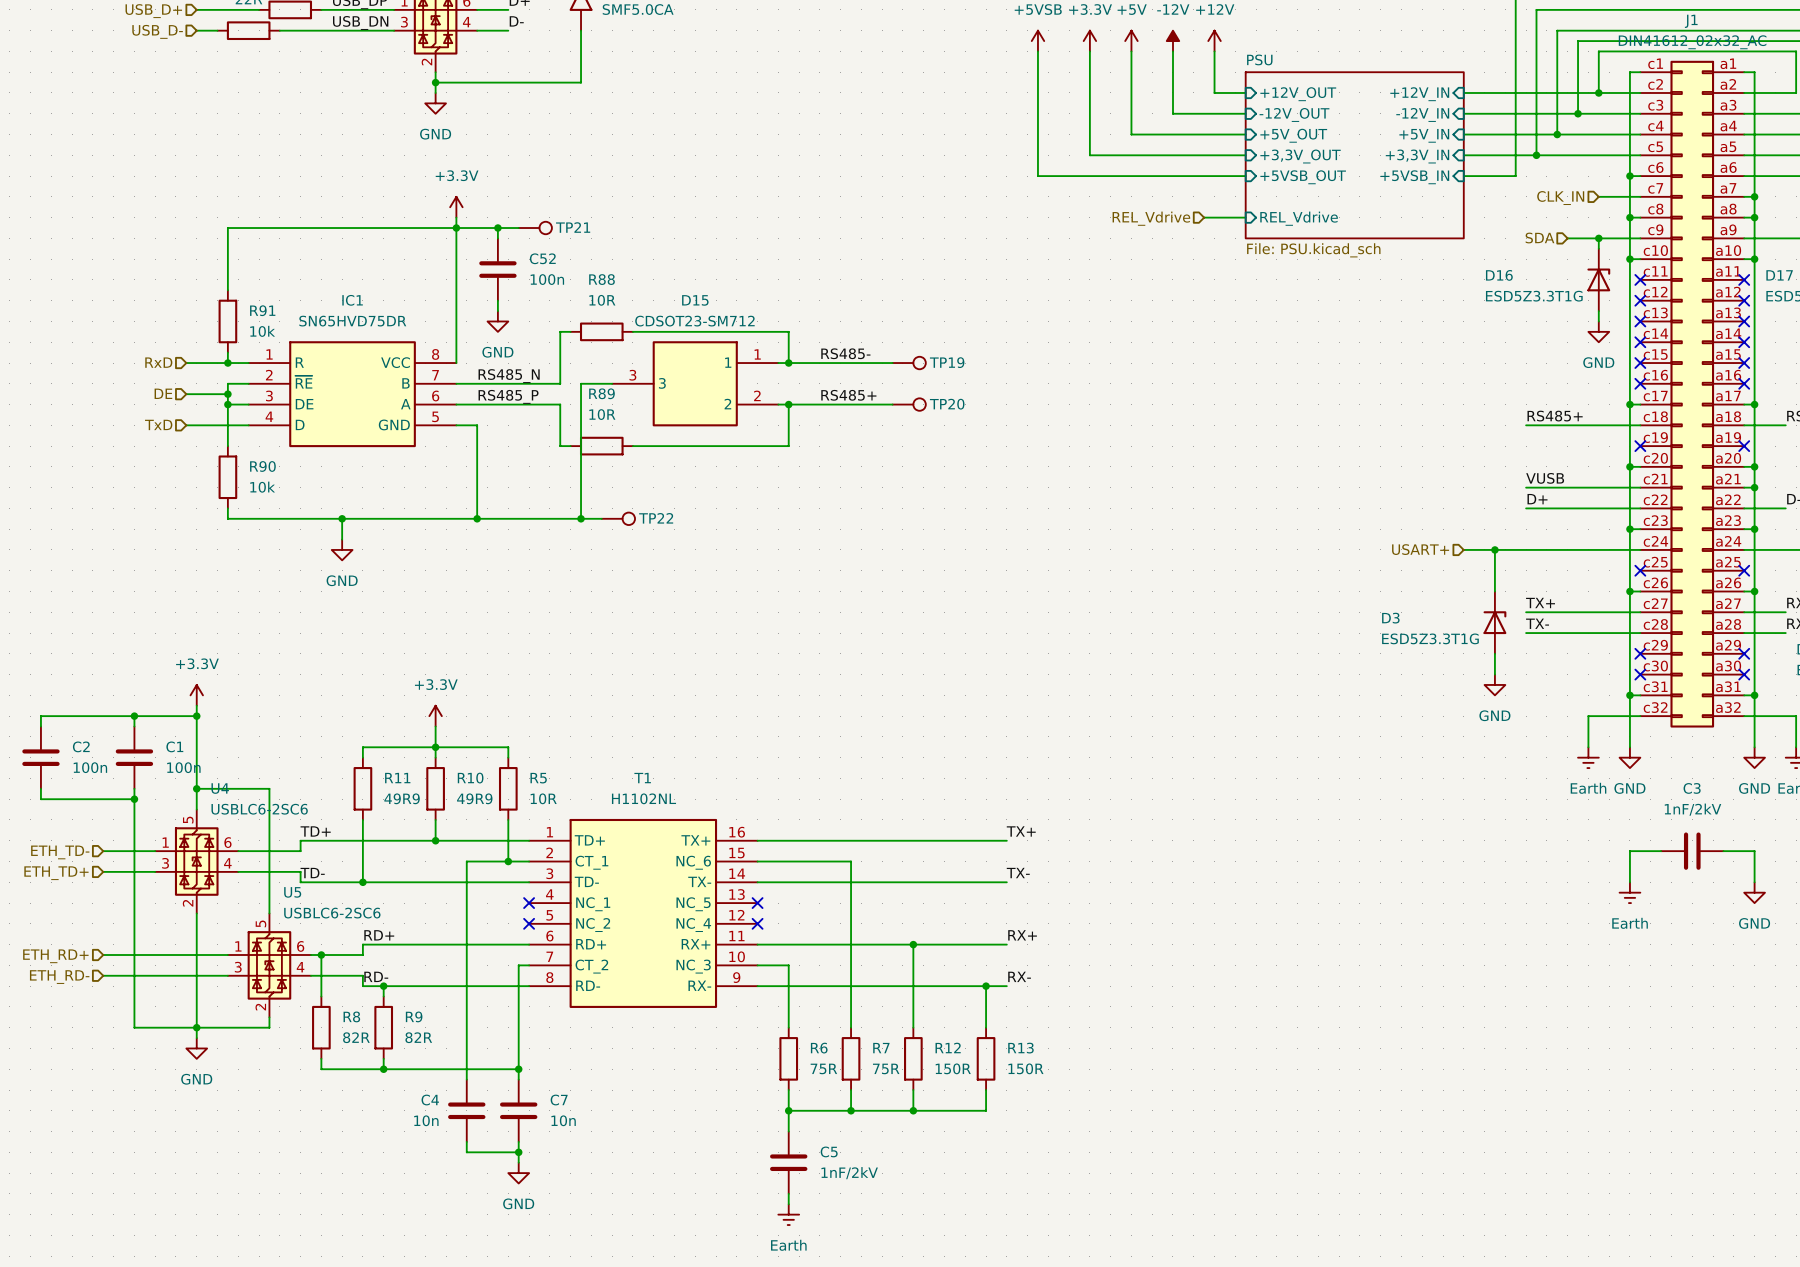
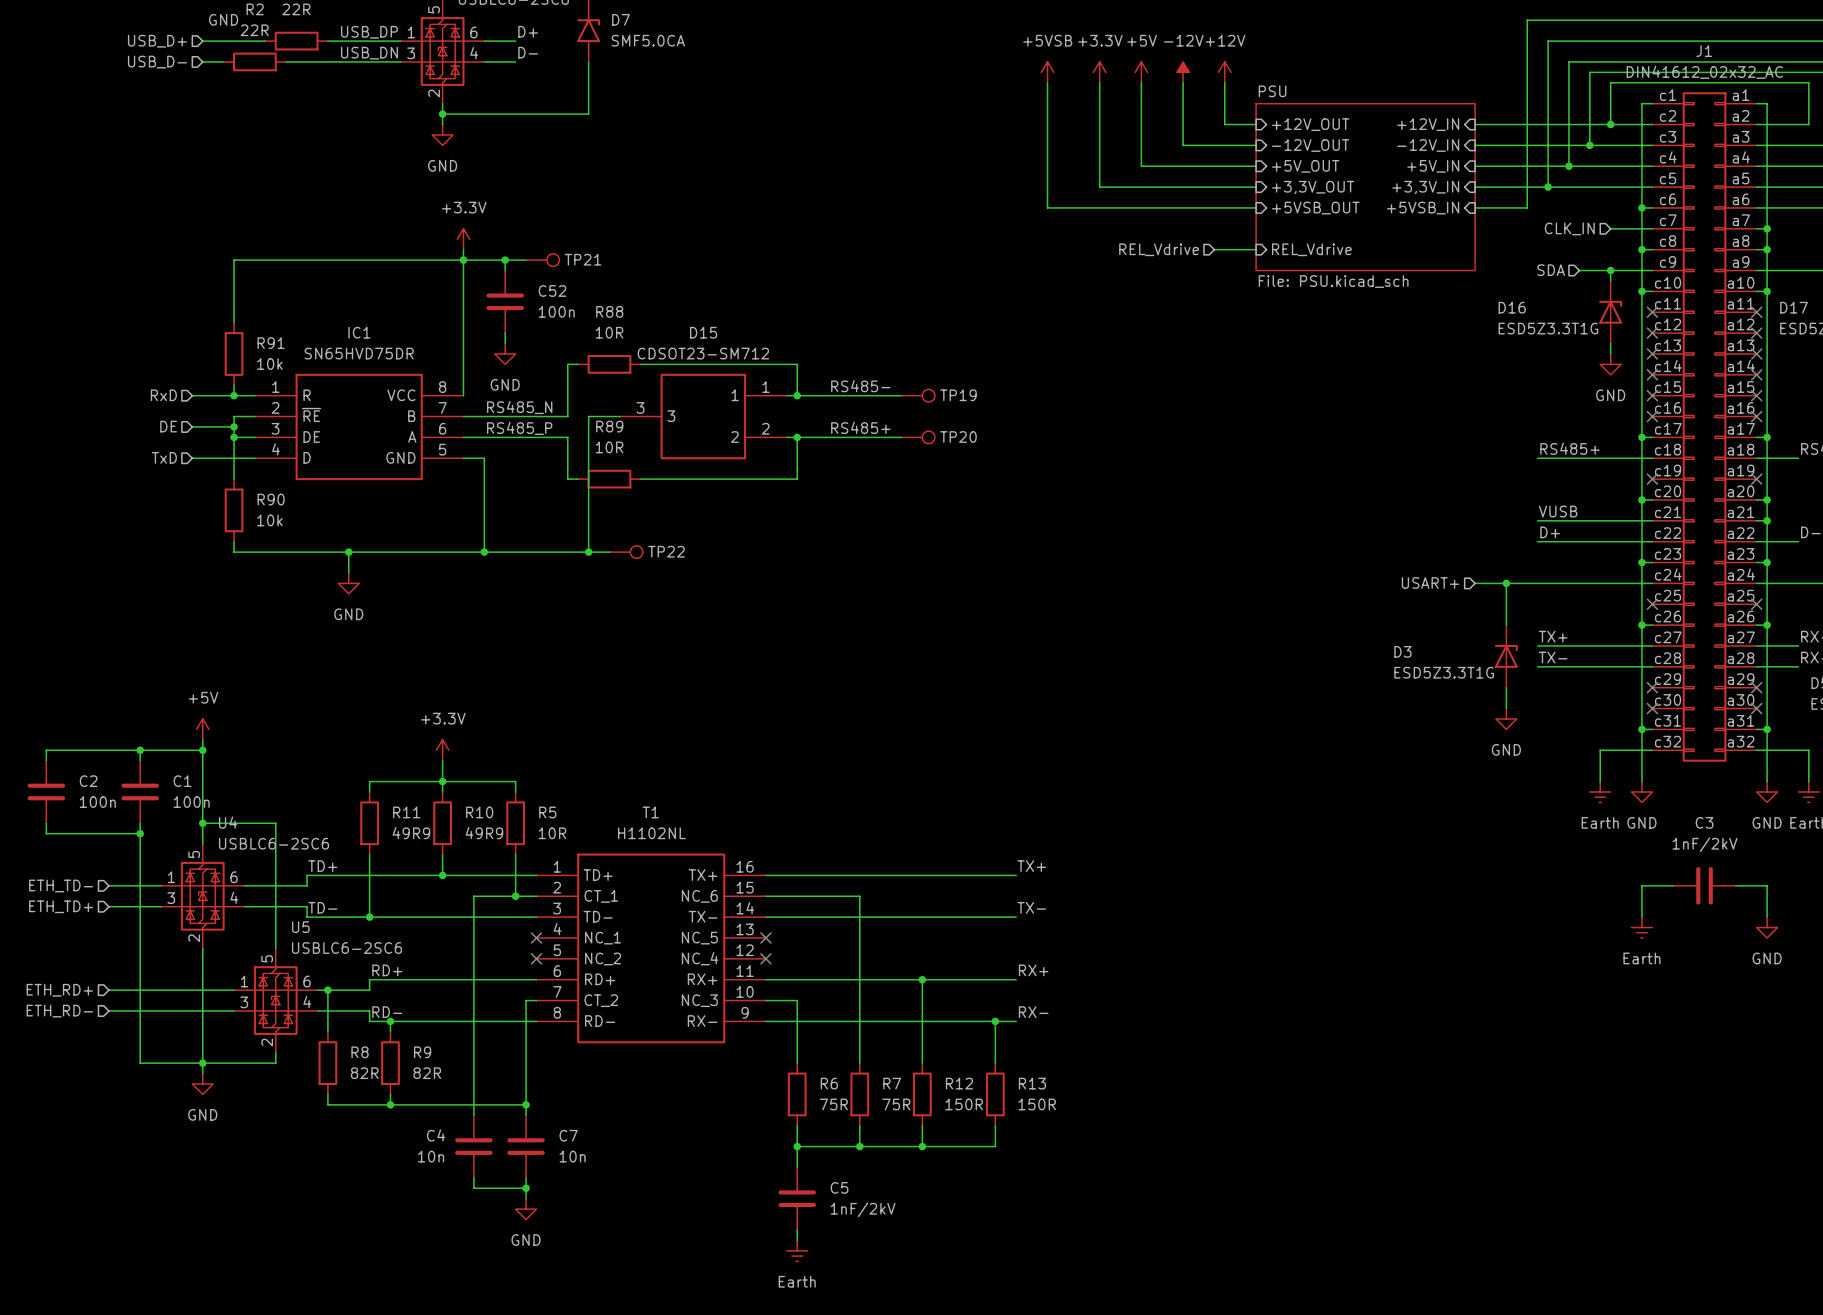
power symbol: +3.3V (196, 695) -> +5V (202, 729)

